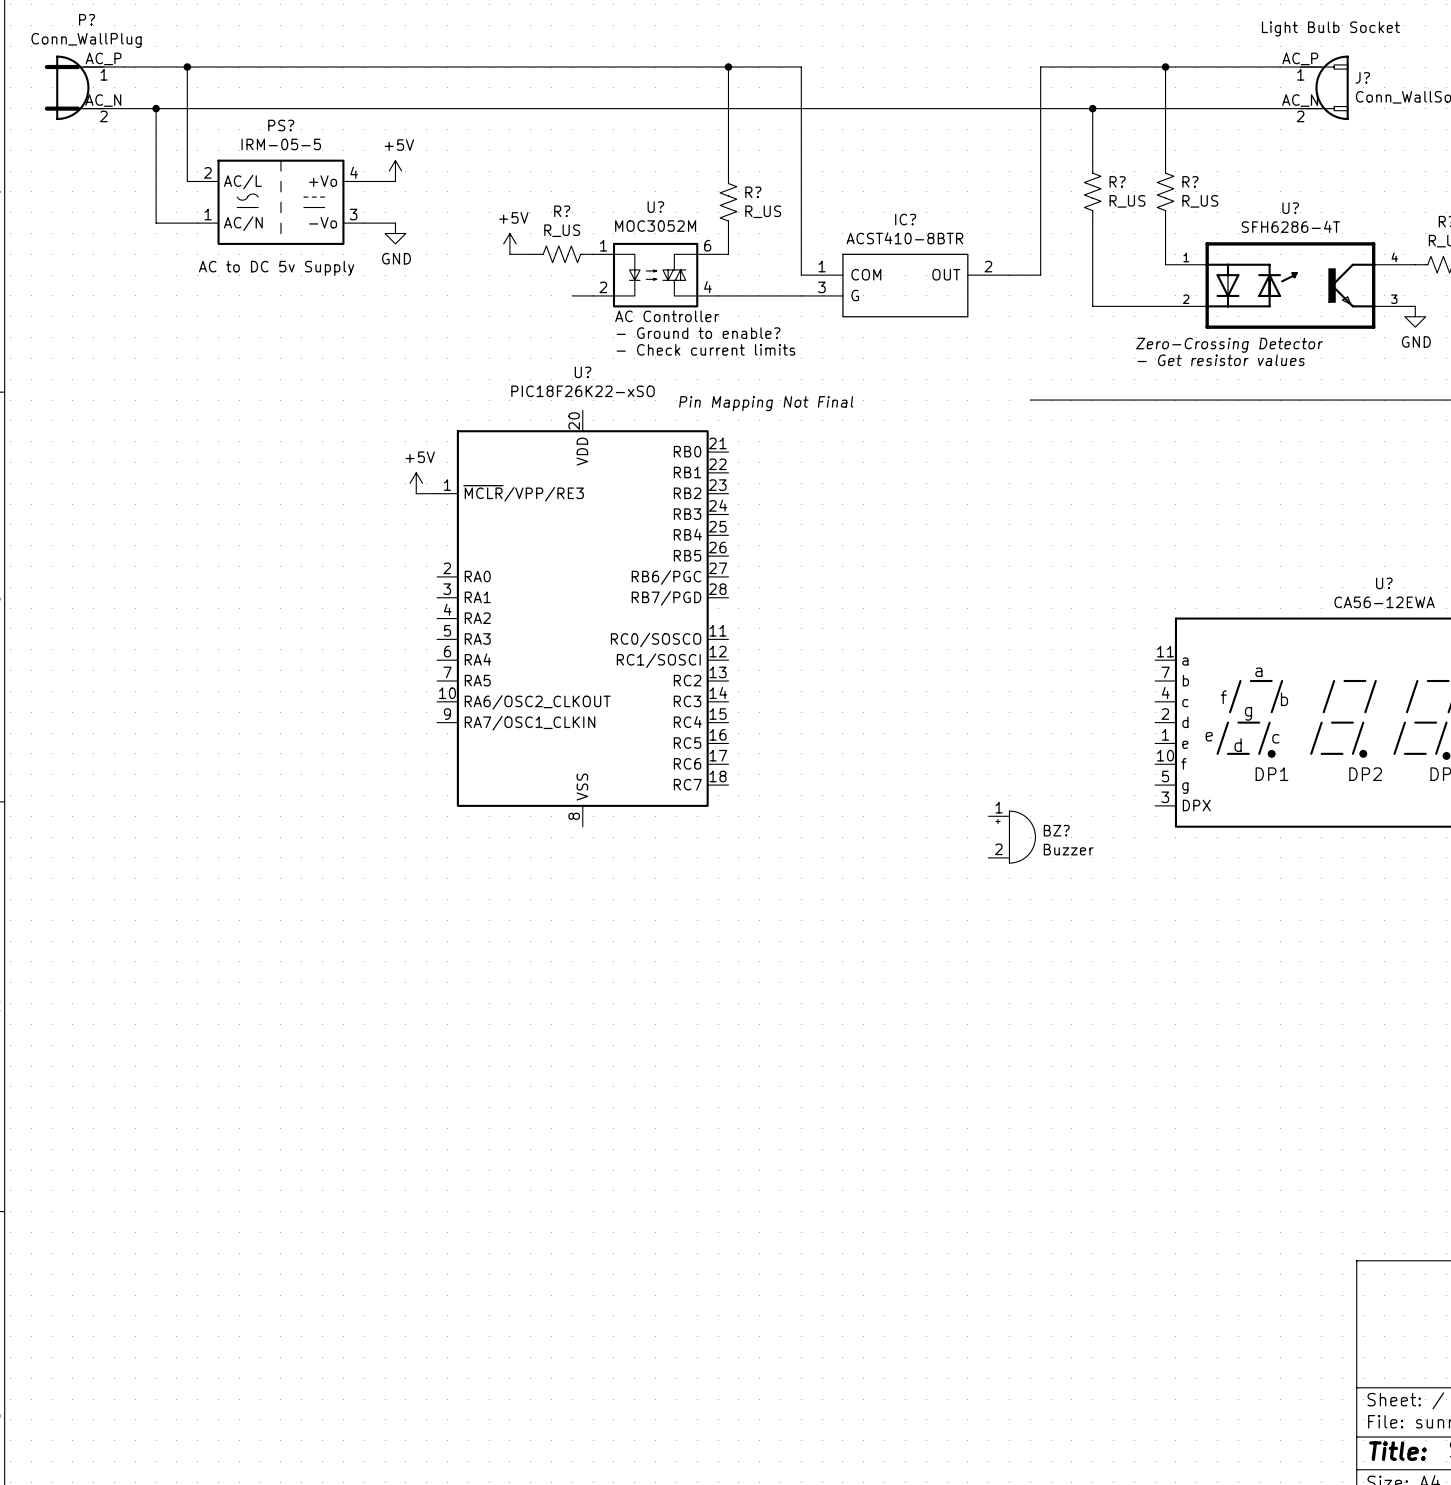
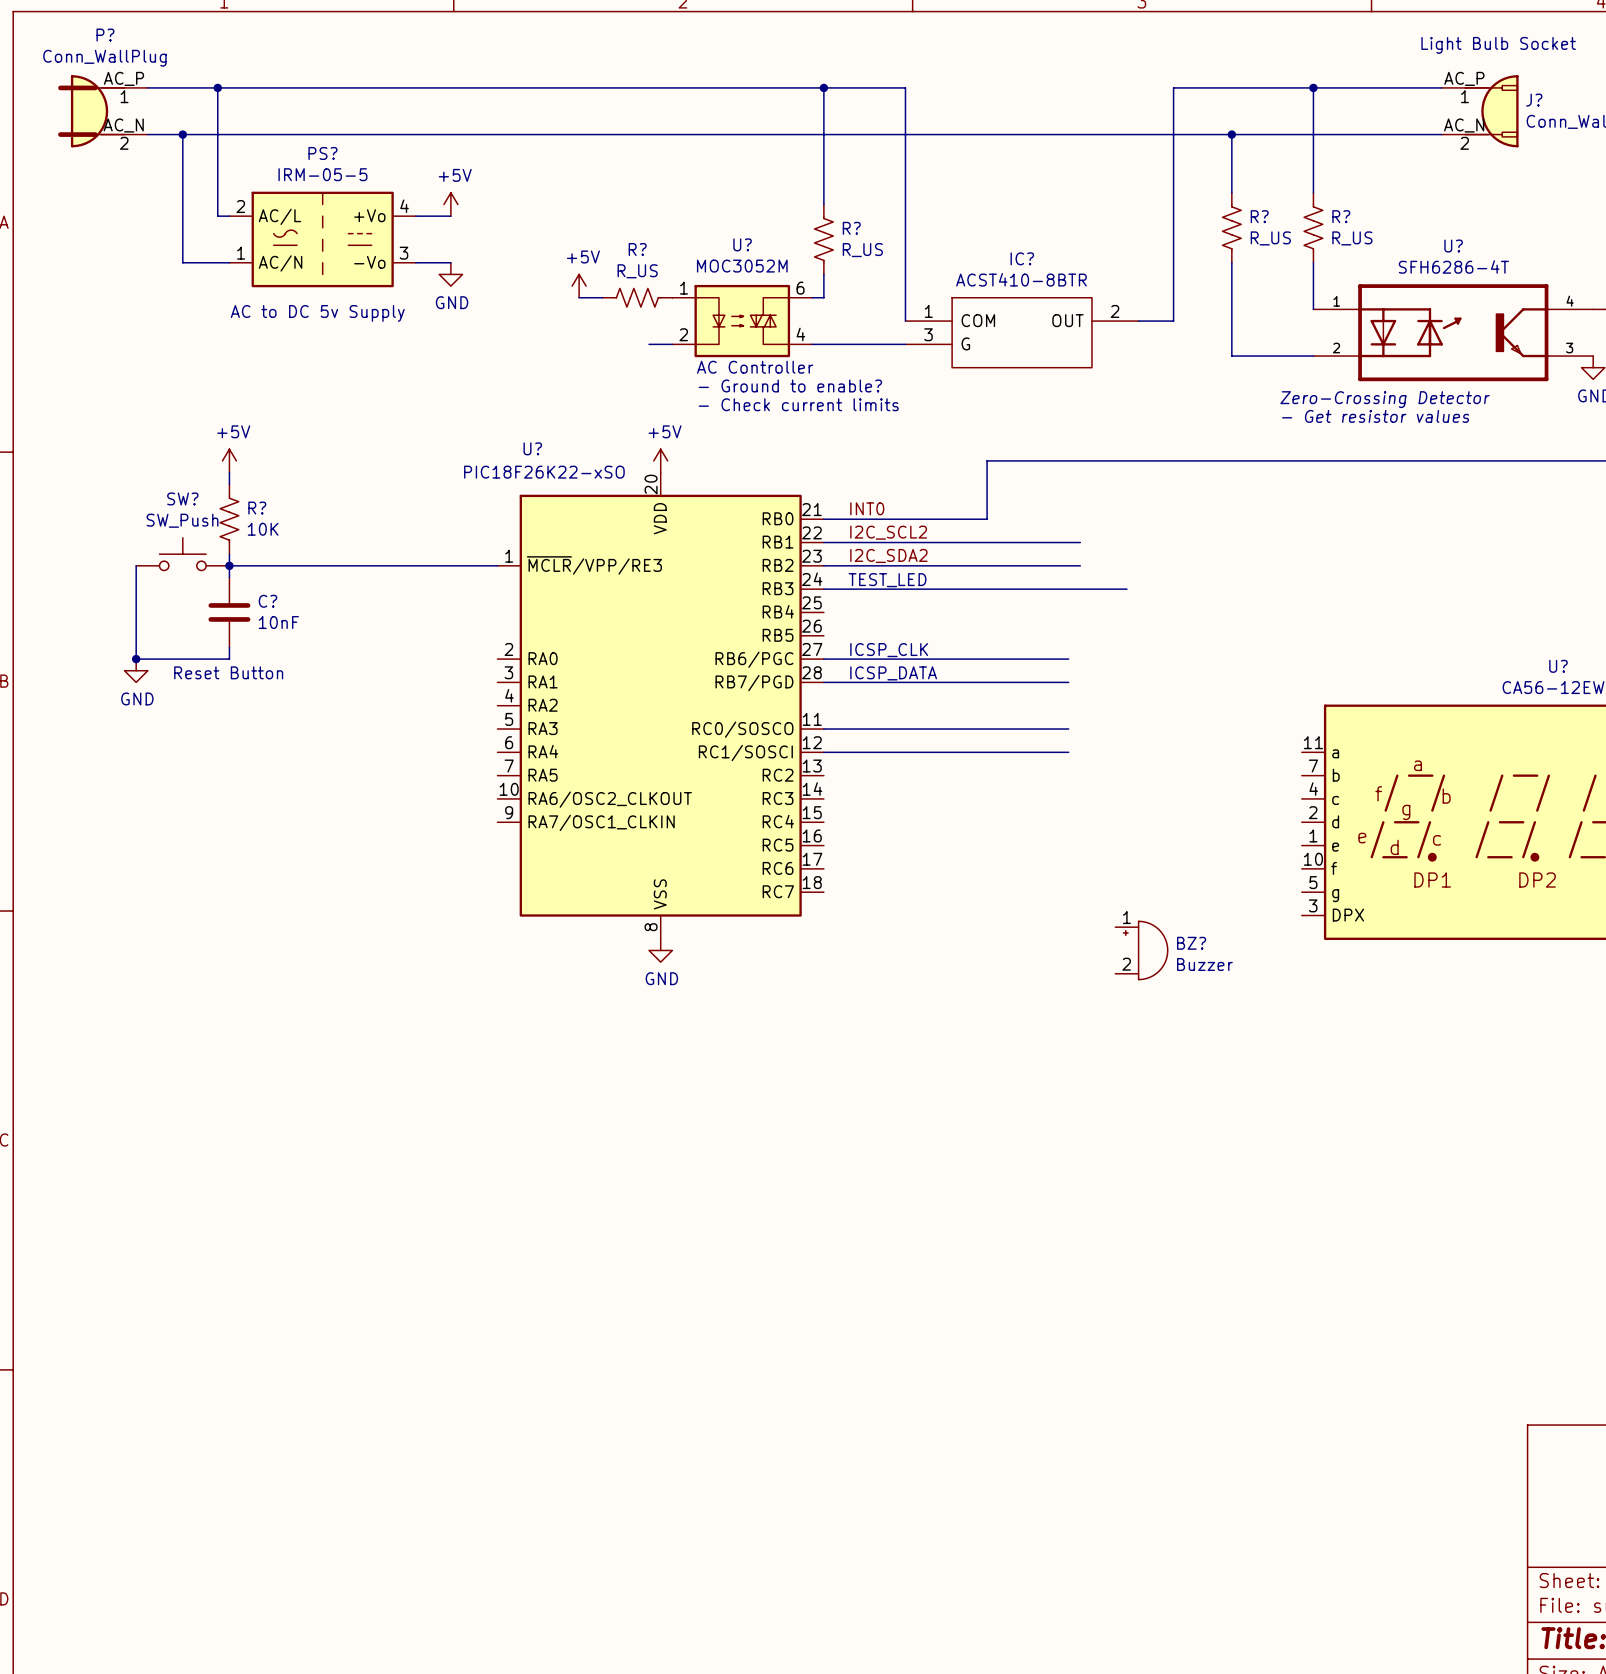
U? name position: U? (583, 372) -> U? (532, 448)
U? value position: PIC18F26K22-xSO (583, 391) -> PIC18F26K22-xSO (544, 472)
power symbol: none -> +5V (229, 460)
power symbol: none -> +5V (660, 460)
wire: none -> (1161, 460) (987, 460) (987, 519) (823, 519)
text: Pin Mapping Not Final (766, 403) -> none
wire: none -> (229, 472) (229, 484)
label: none -> INT0 (867, 508)
R?: none -> 10K (229, 519)
label: none -> I2C_SCL2 (888, 532)
wire: none -> (823, 542) (1080, 542)
SW?: none -> SW_Push (182, 554)
wire: none -> (229, 554) (229, 577)
power symbol: +5V (416, 483) -> none
label: none -> I2C_SDA2 (888, 555)
wire: none -> (136, 565) (136, 659) (229, 659) (229, 647)
wire: none -> (229, 565) (474, 565)
junction: none -> (229, 565)
wire: none -> (823, 565) (1080, 565)
text: none -> TEST_LED (887, 580)
wire: none -> (823, 589) (1126, 589)
C?: none -> 10nF (229, 612)
text: none -> ICSP_CLK (889, 650)
junction: none -> (136, 659)
wire: none -> (823, 659) (1068, 659)
power symbol: none -> GND (136, 670)
text: none -> Reset Button (228, 672)
text: none -> ICSP_DATA (893, 673)
wire: none -> (823, 682) (1068, 682)
wire: none -> (823, 729) (1068, 729)
wire: none -> (823, 752) (1068, 752)
power symbol: none -> GND (660, 950)

